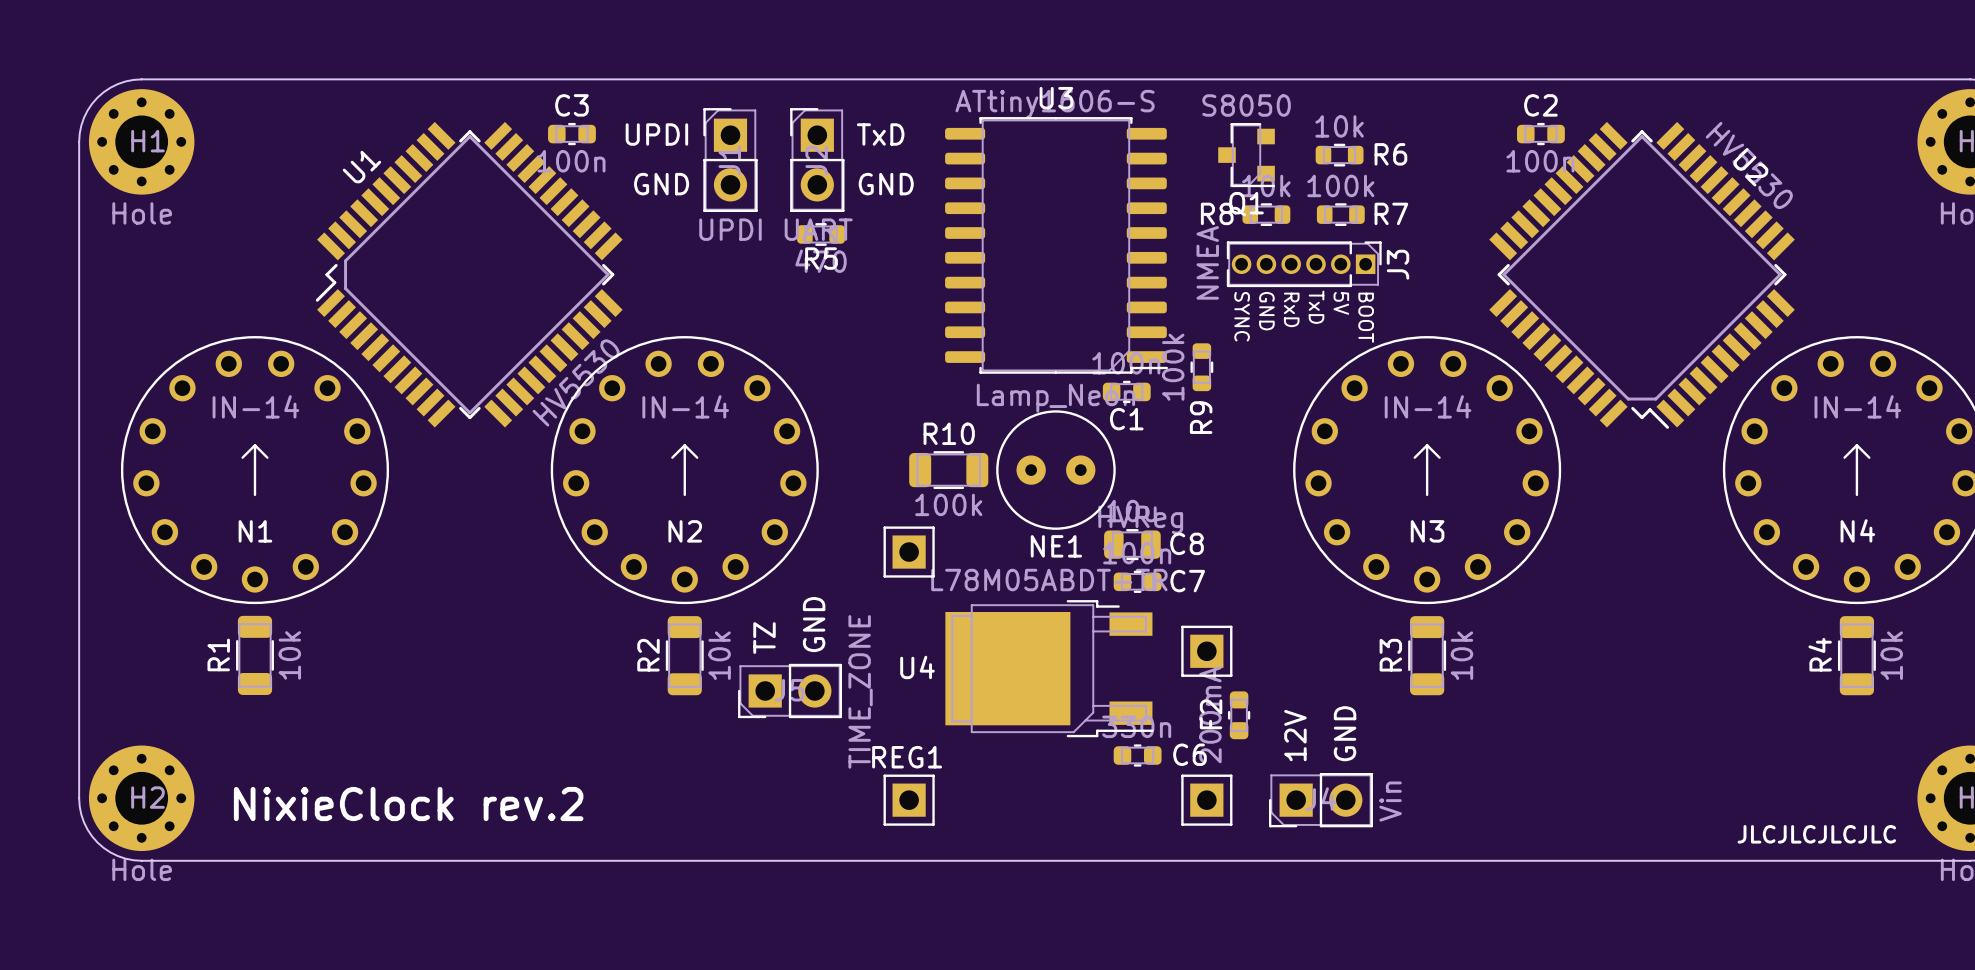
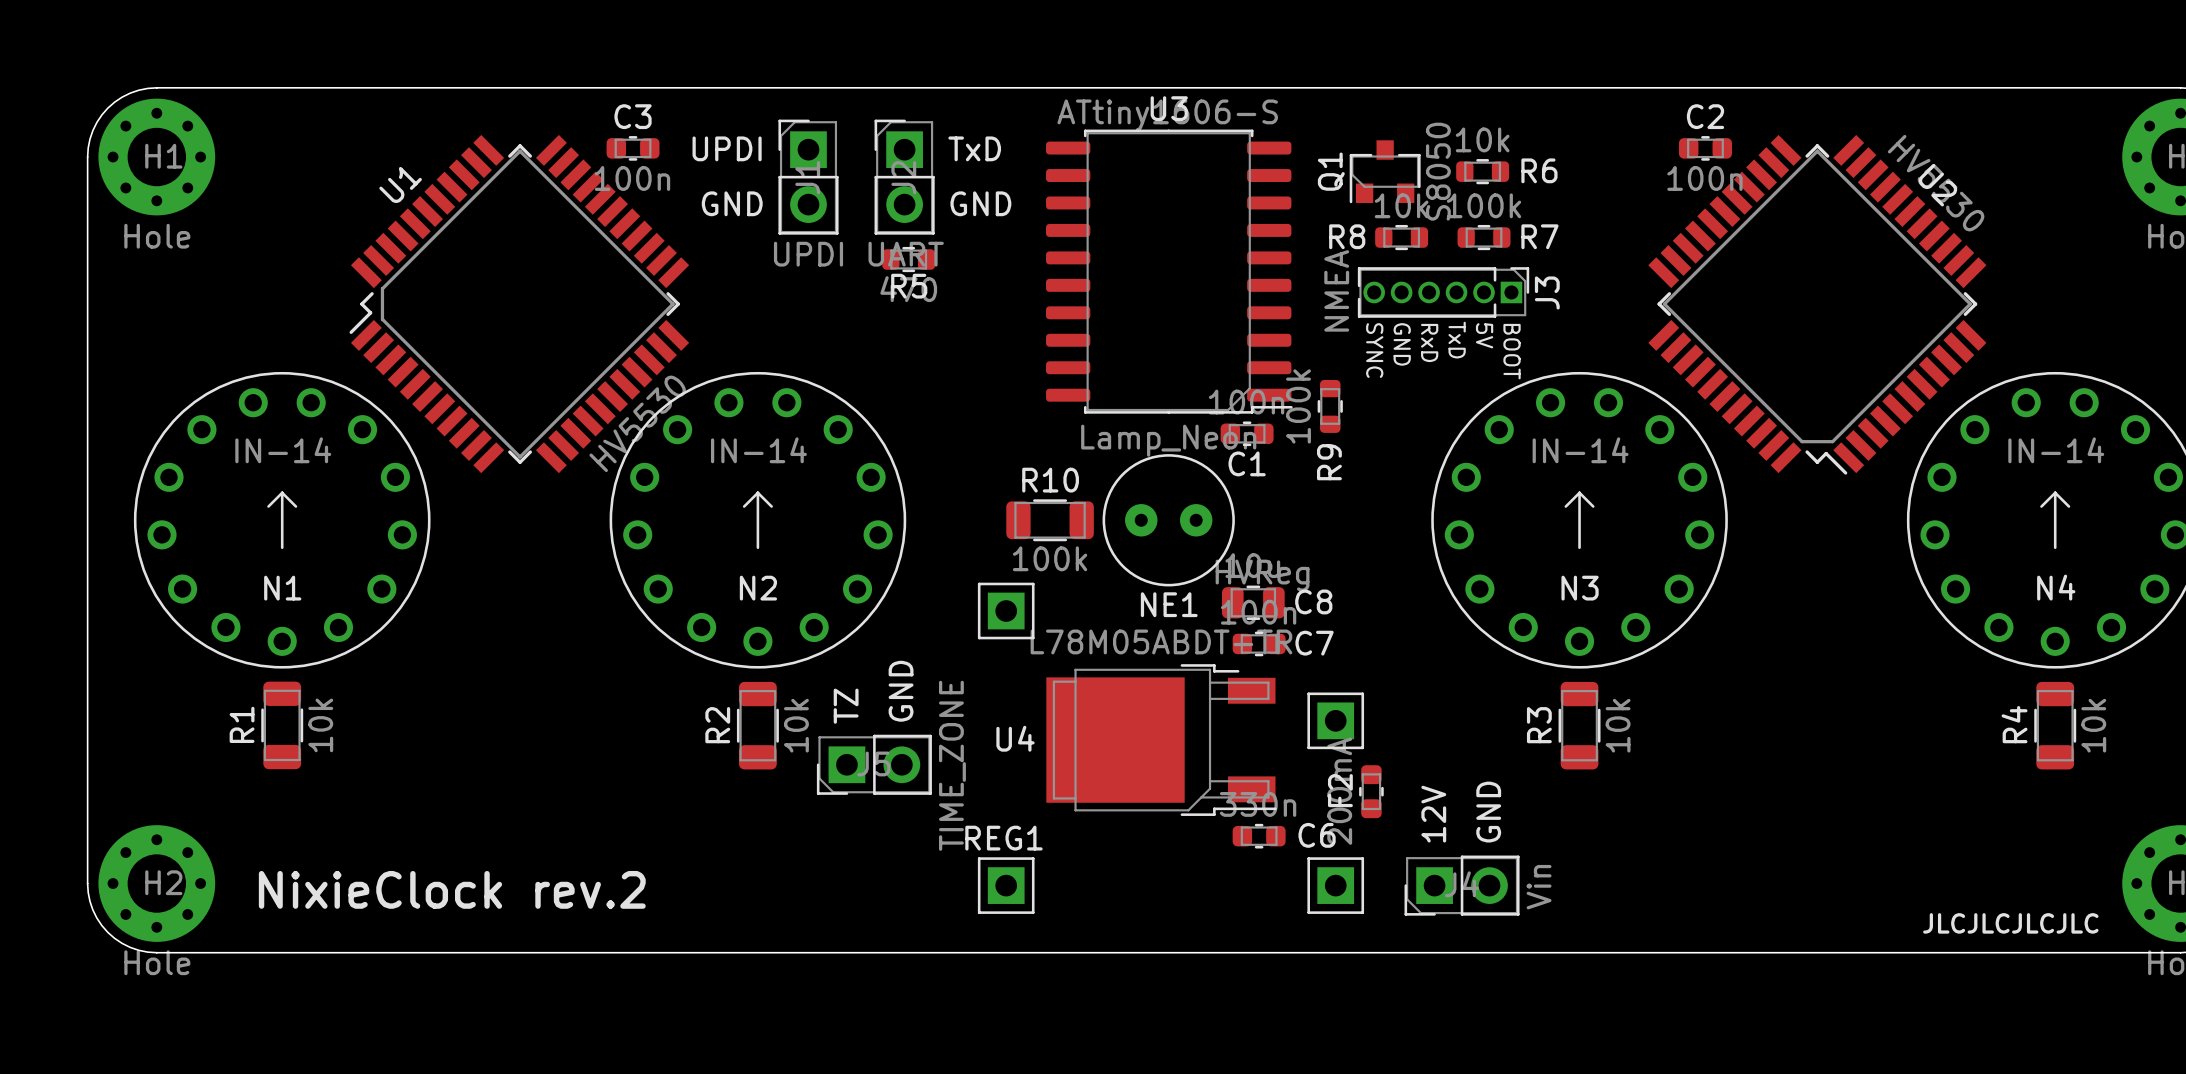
Q1 rotation: 0° (1246, 155) -> 90° clockwise (1385, 171)

